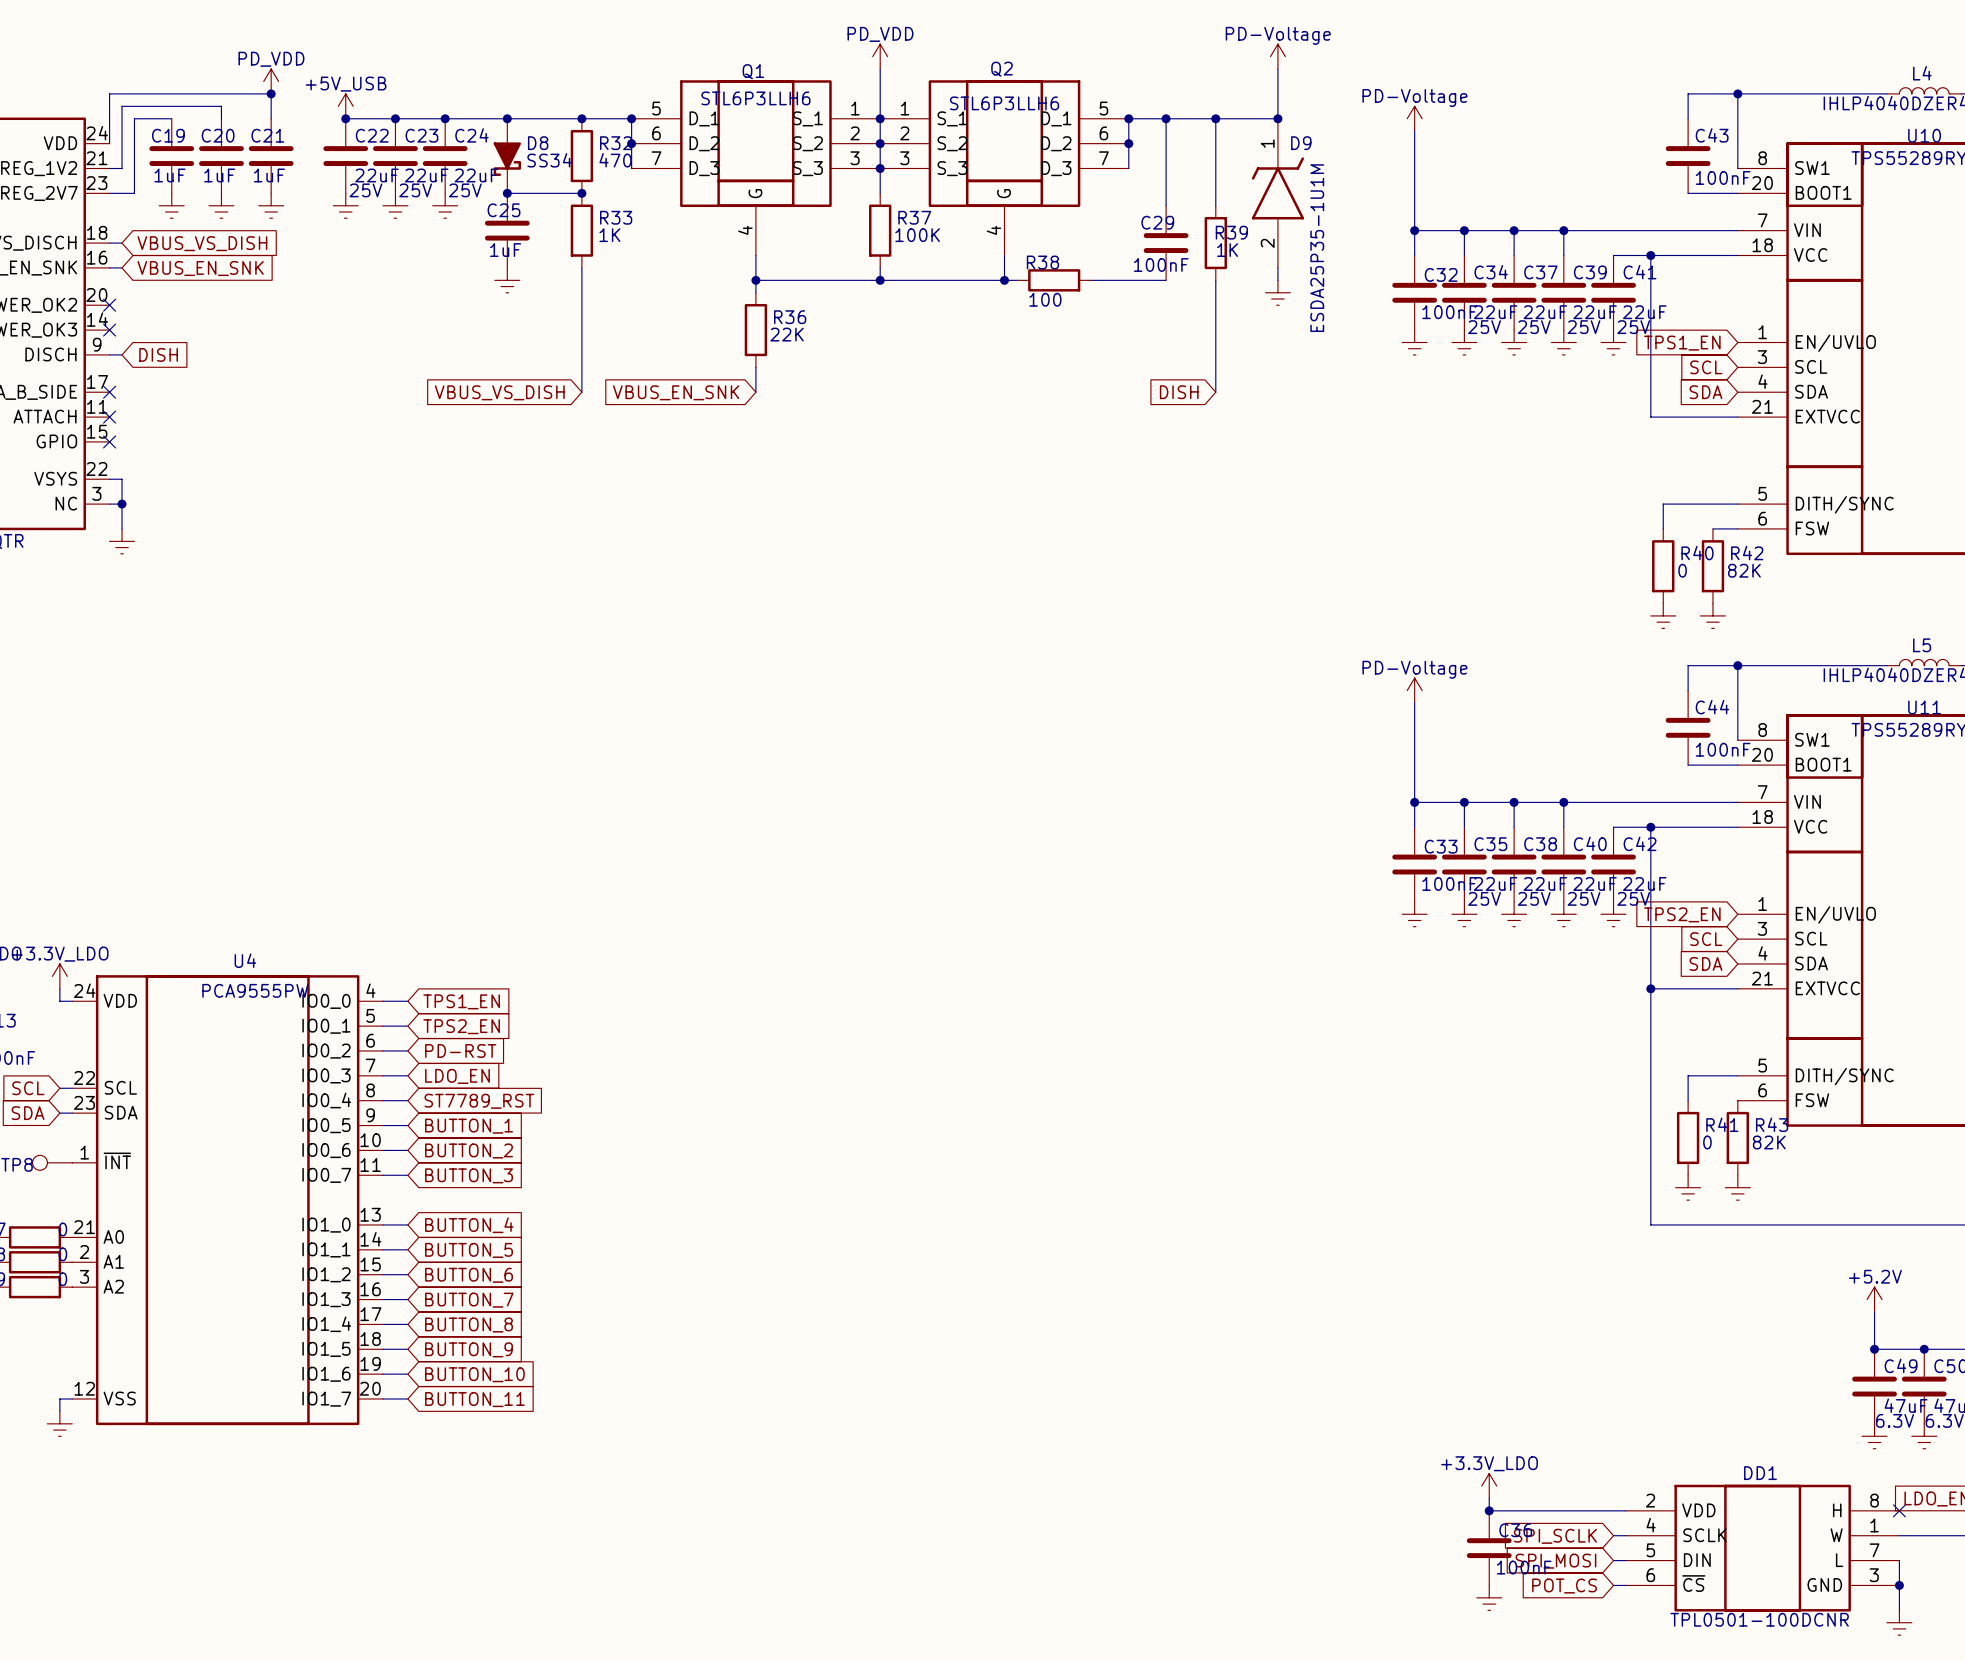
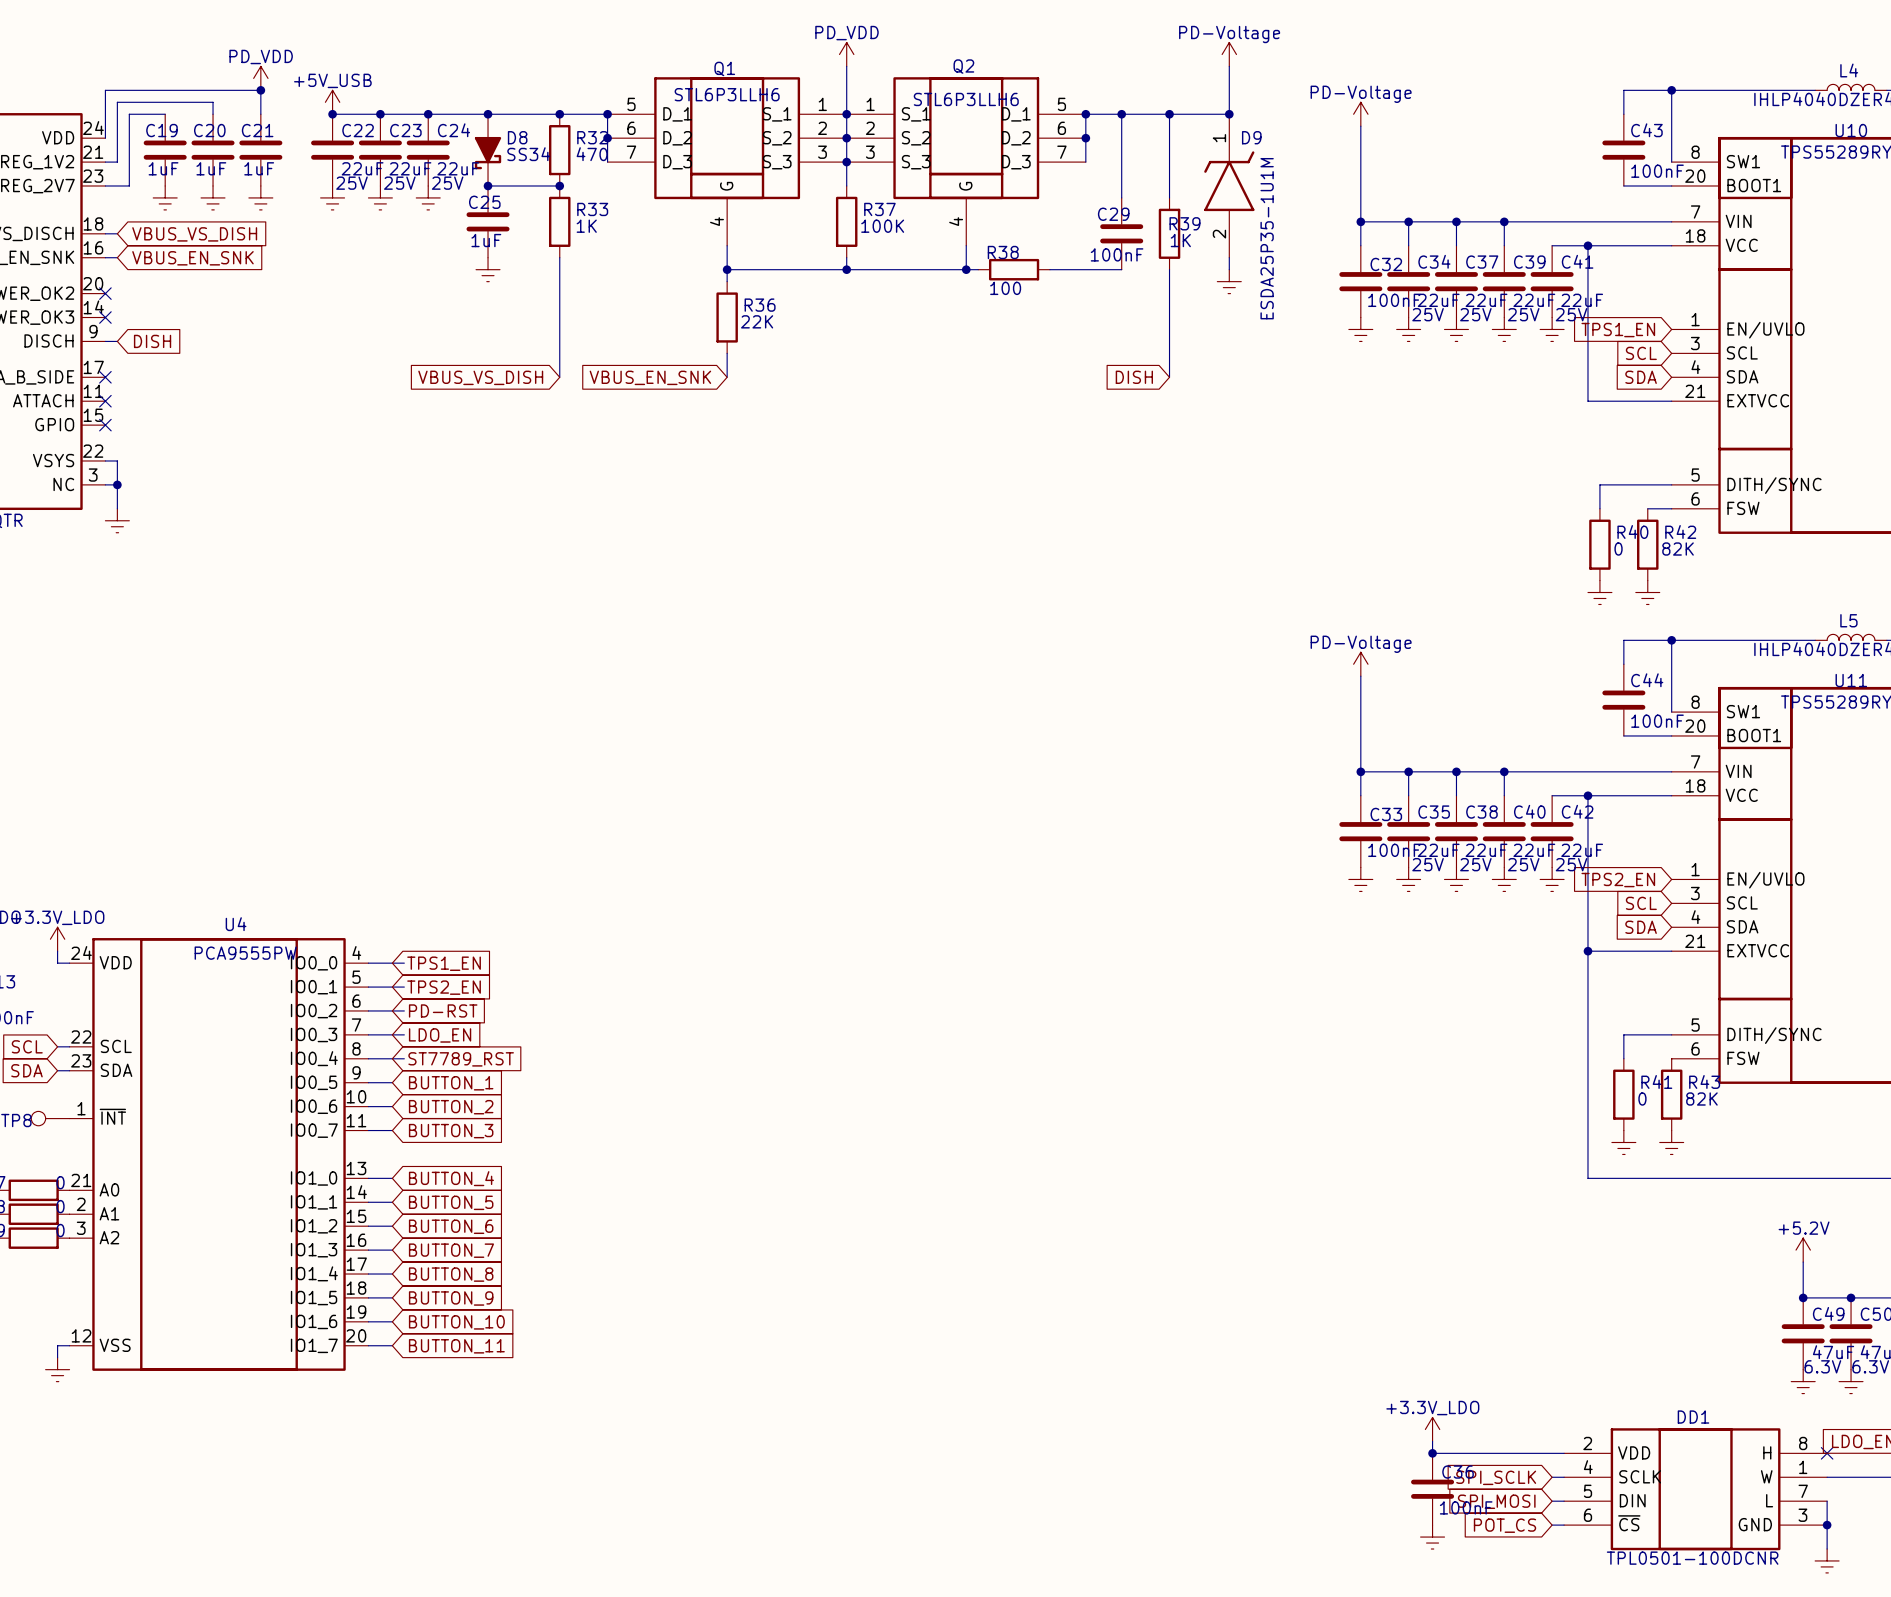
wire: none -> (392, 963) (404, 963)
wire: none -> (392, 987) (404, 987)
wire: none -> (392, 1010) (404, 1010)
wire: none -> (392, 1034) (404, 1034)
wire: none -> (392, 1058) (404, 1058)

